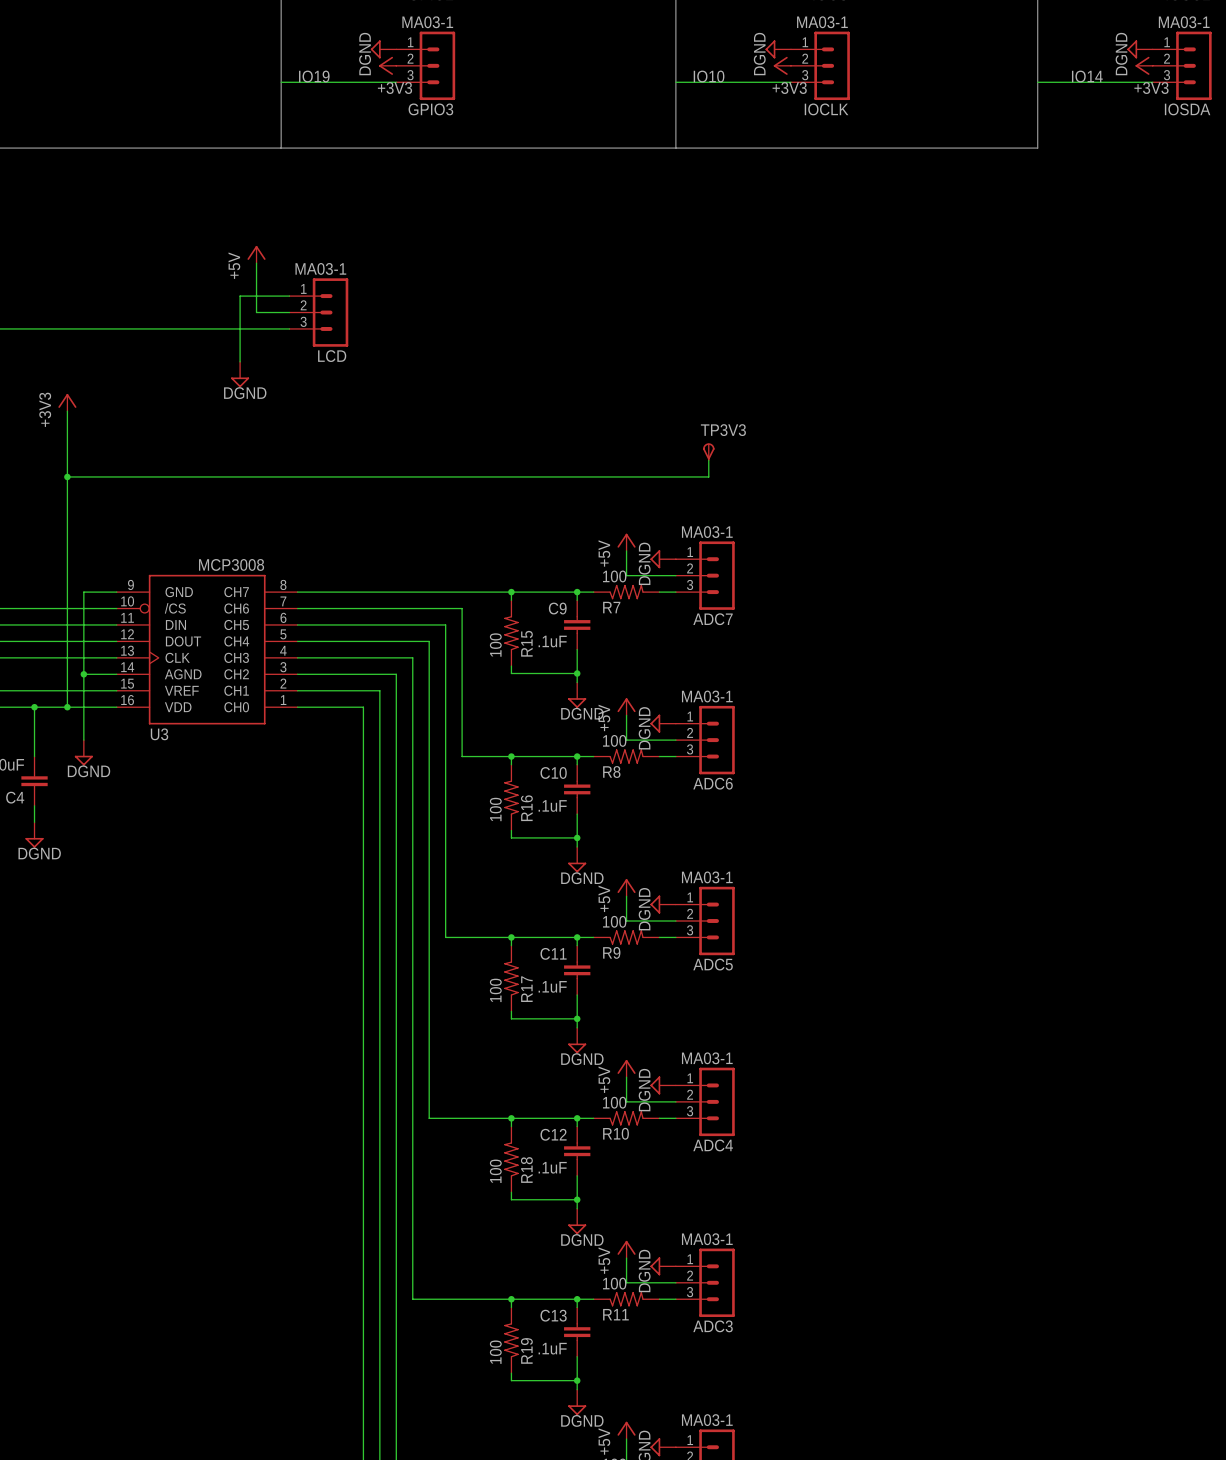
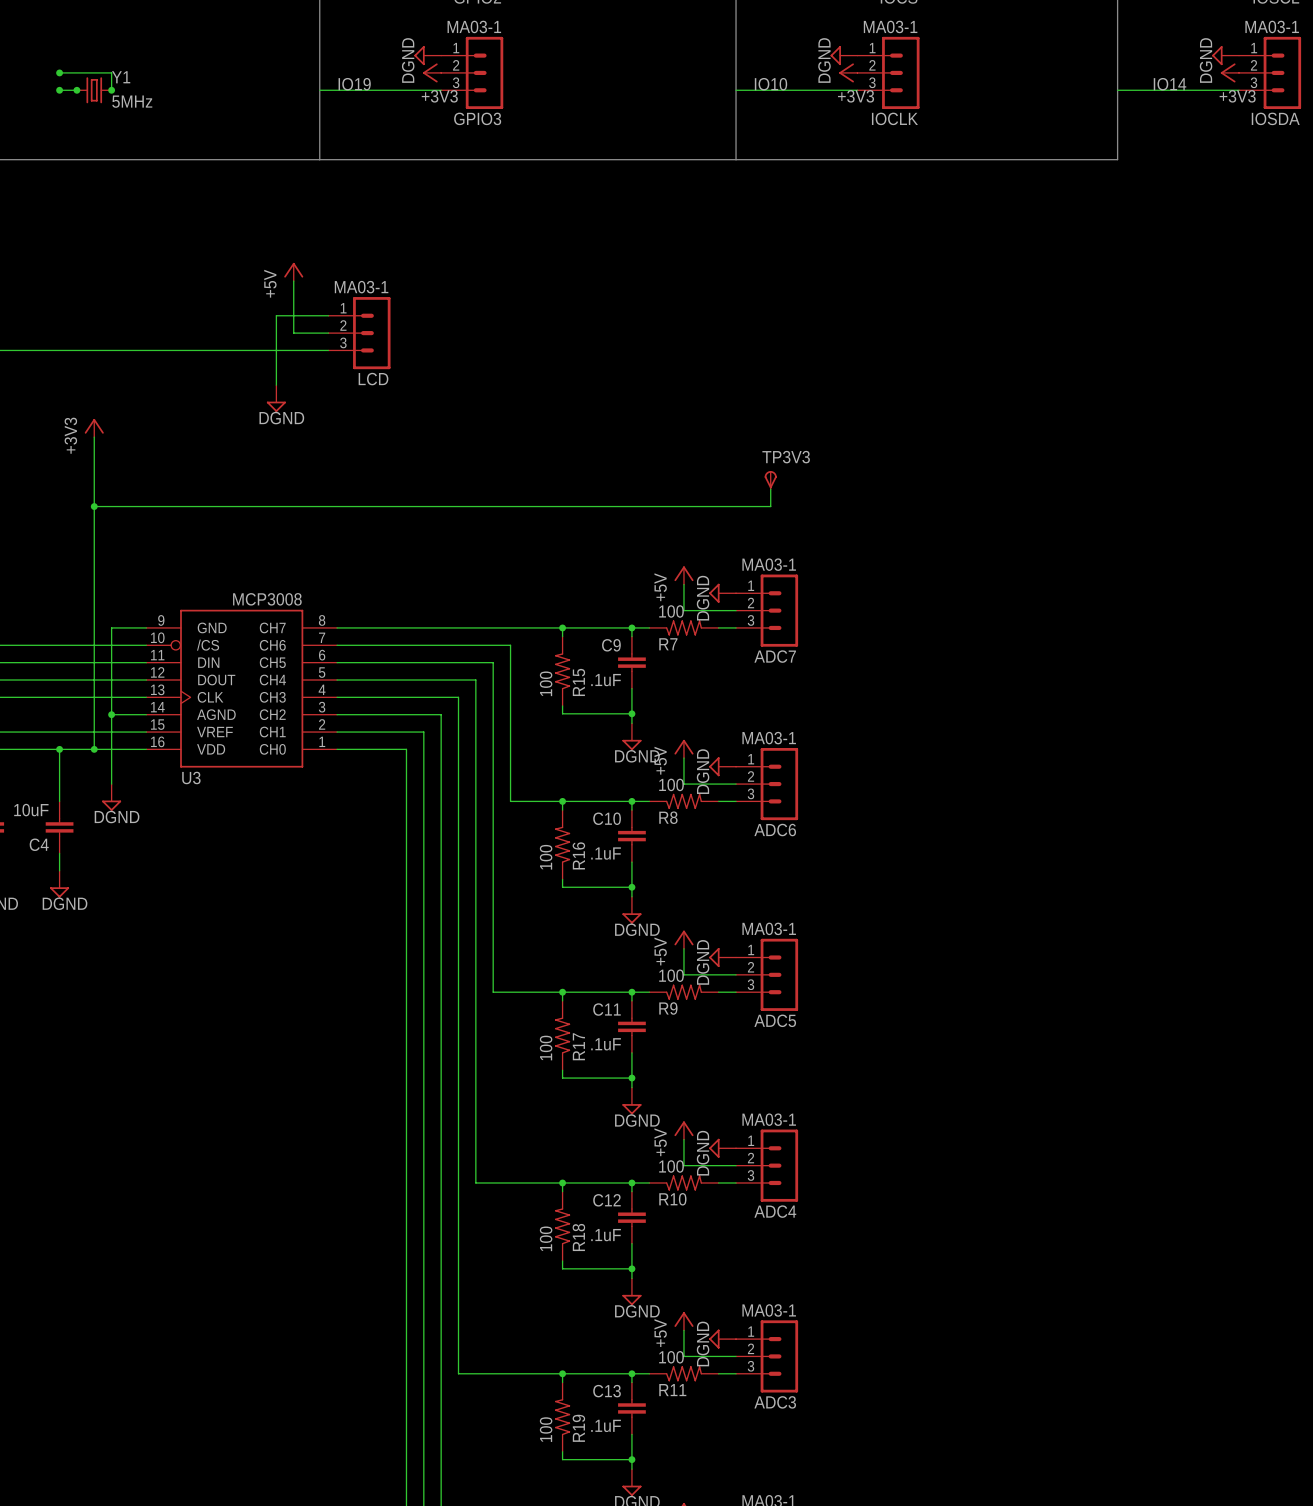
wire: none -> (59, 72) (111, 72) (111, 90)
junction: none -> (59, 72)
wire: none -> (59, 90) (76, 90)
junction: none -> (59, 90)
junction: none -> (76, 90)
Y1: none -> 5MHz (94, 90)
junction: none -> (111, 90)

